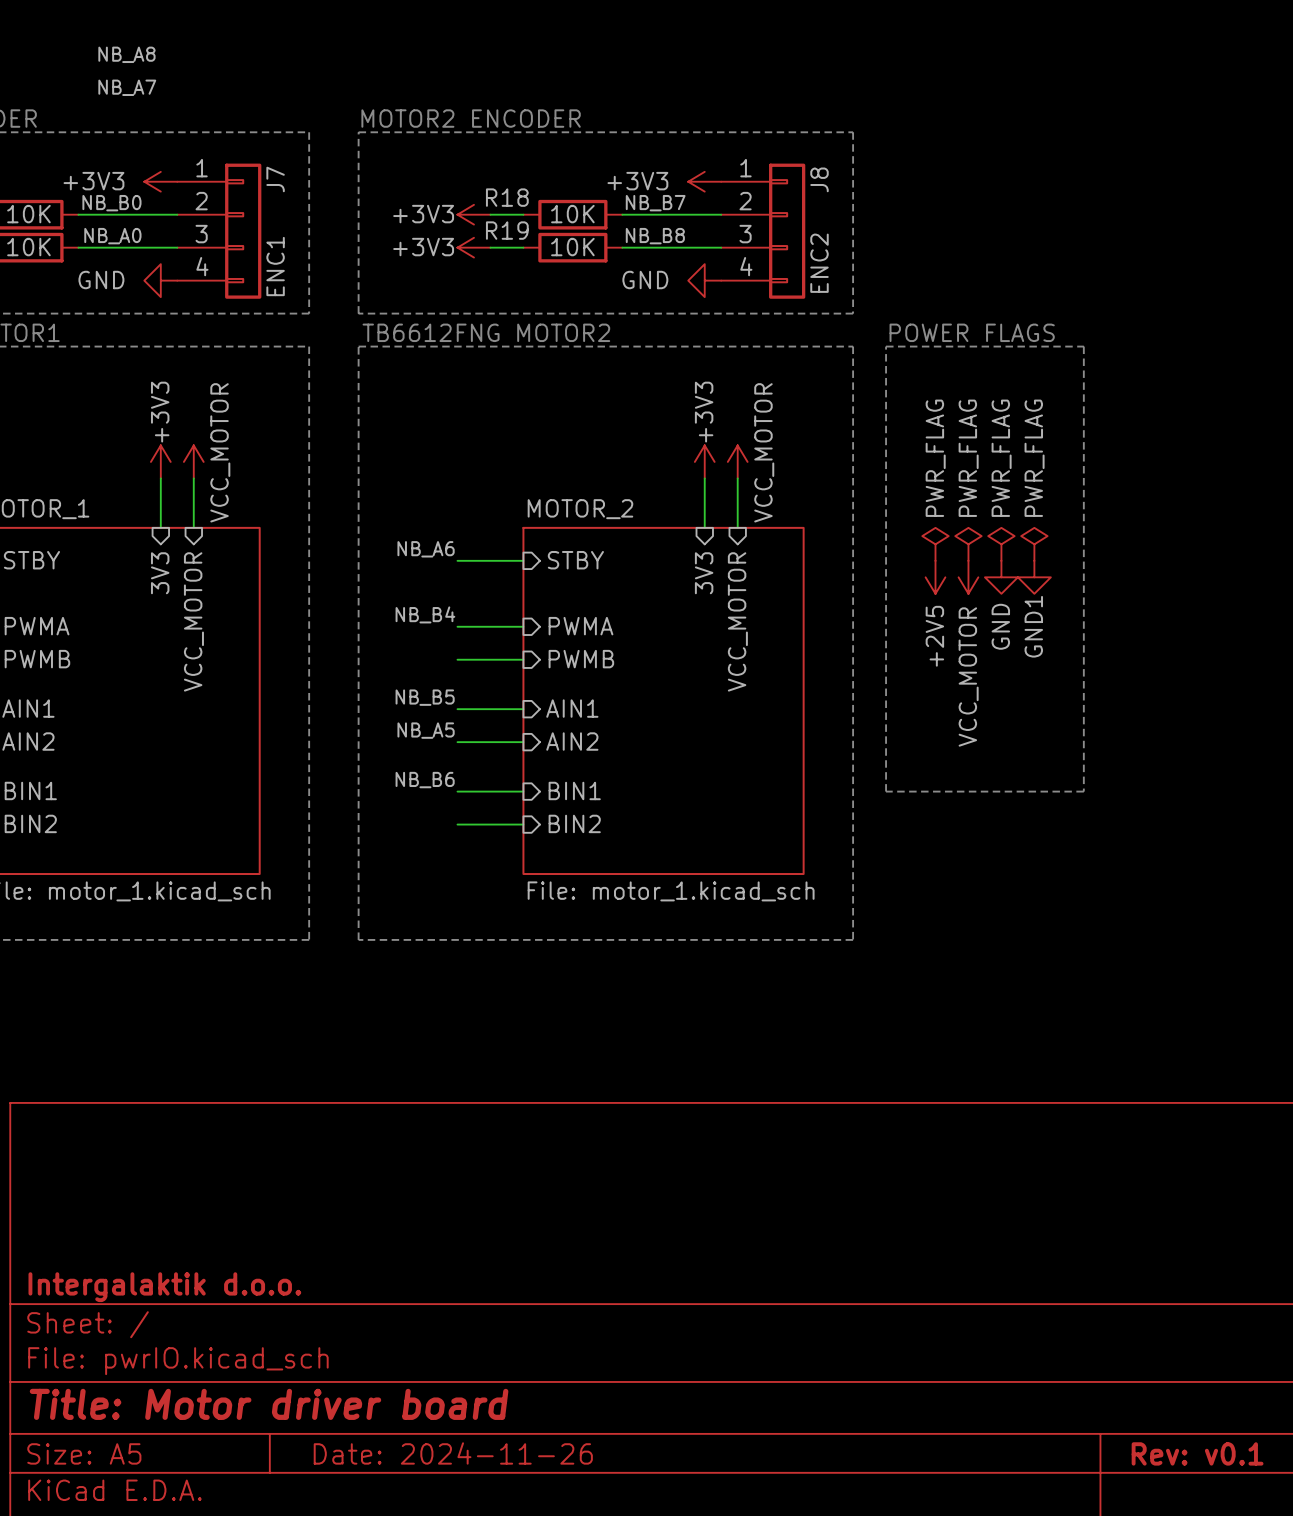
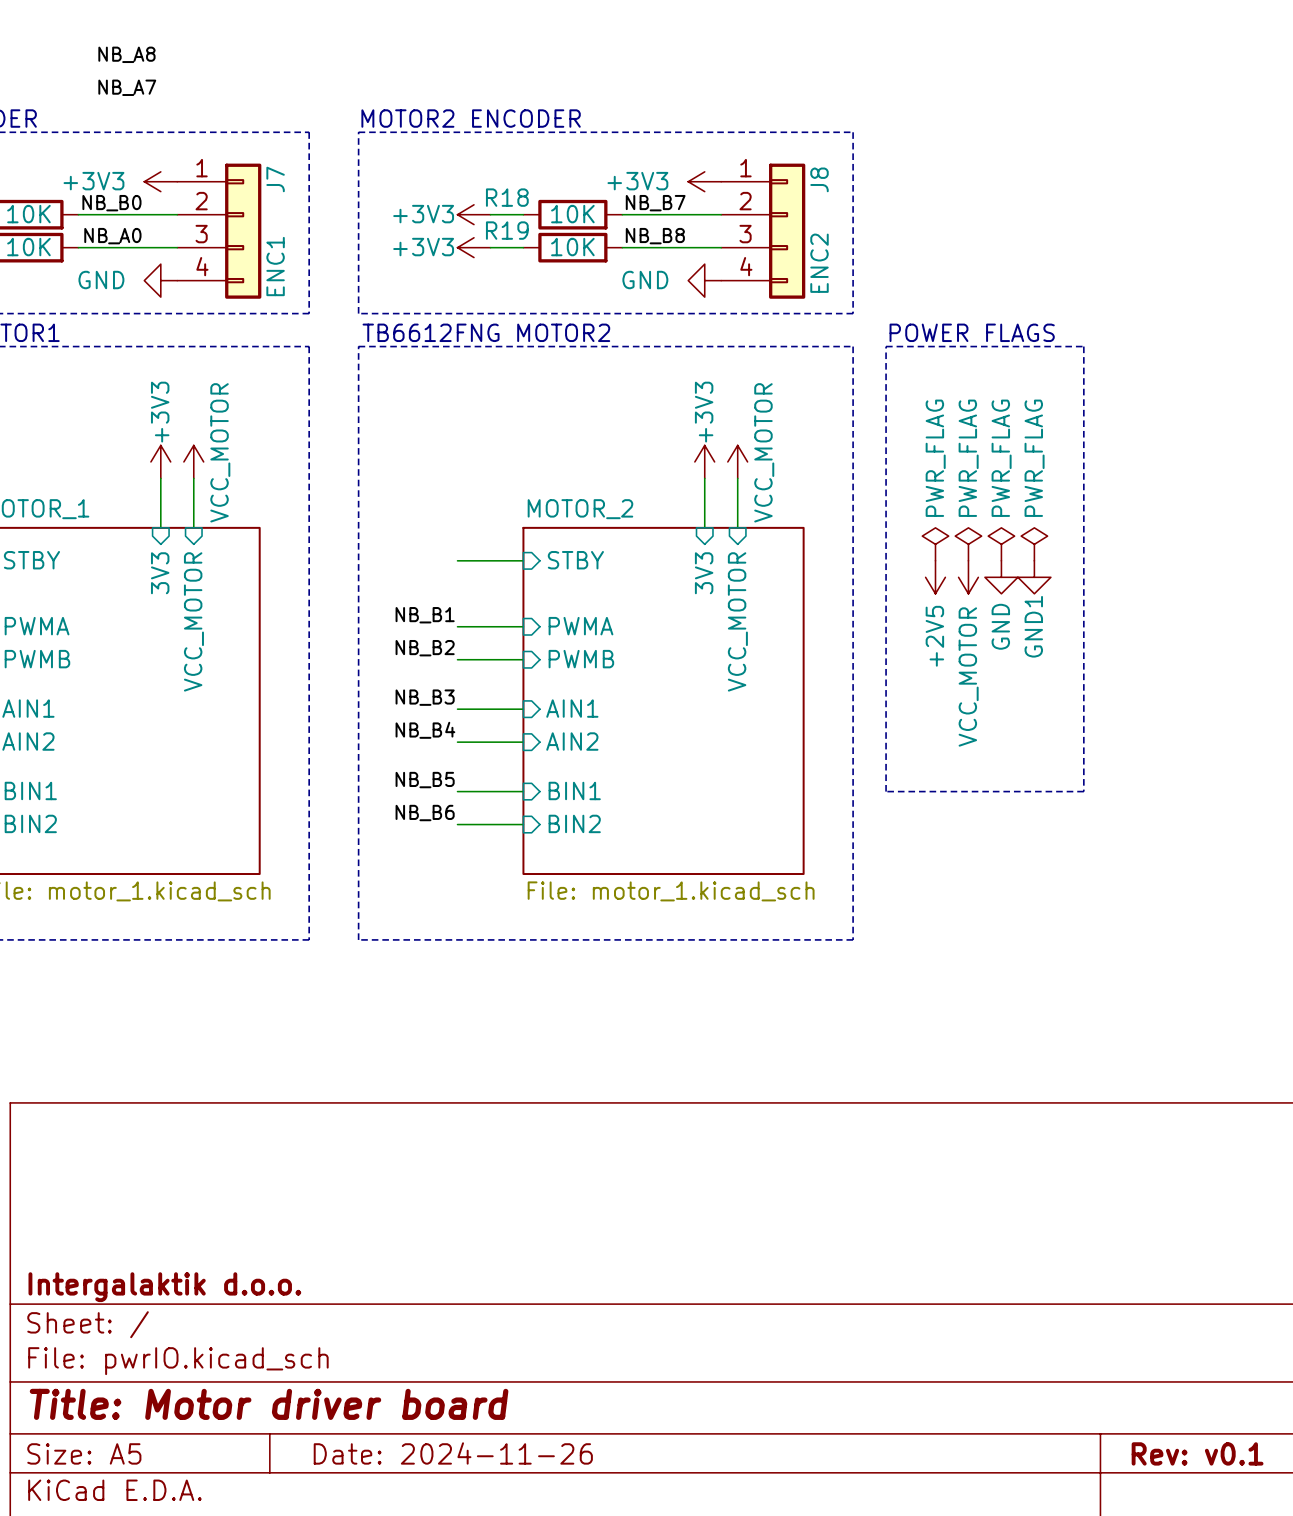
label: NB_A6 (426, 549) -> none
label: NB_B4 (425, 614) -> NB_B1 (425, 615)
label: none -> NB_B2 (425, 648)
label: NB_B5 (425, 697) -> NB_B3 (425, 697)
label: NB_A5 (426, 730) -> NB_B4 (425, 730)
label: NB_B6 (425, 780) -> NB_B5 (425, 780)
label: none -> NB_B6 (425, 813)

